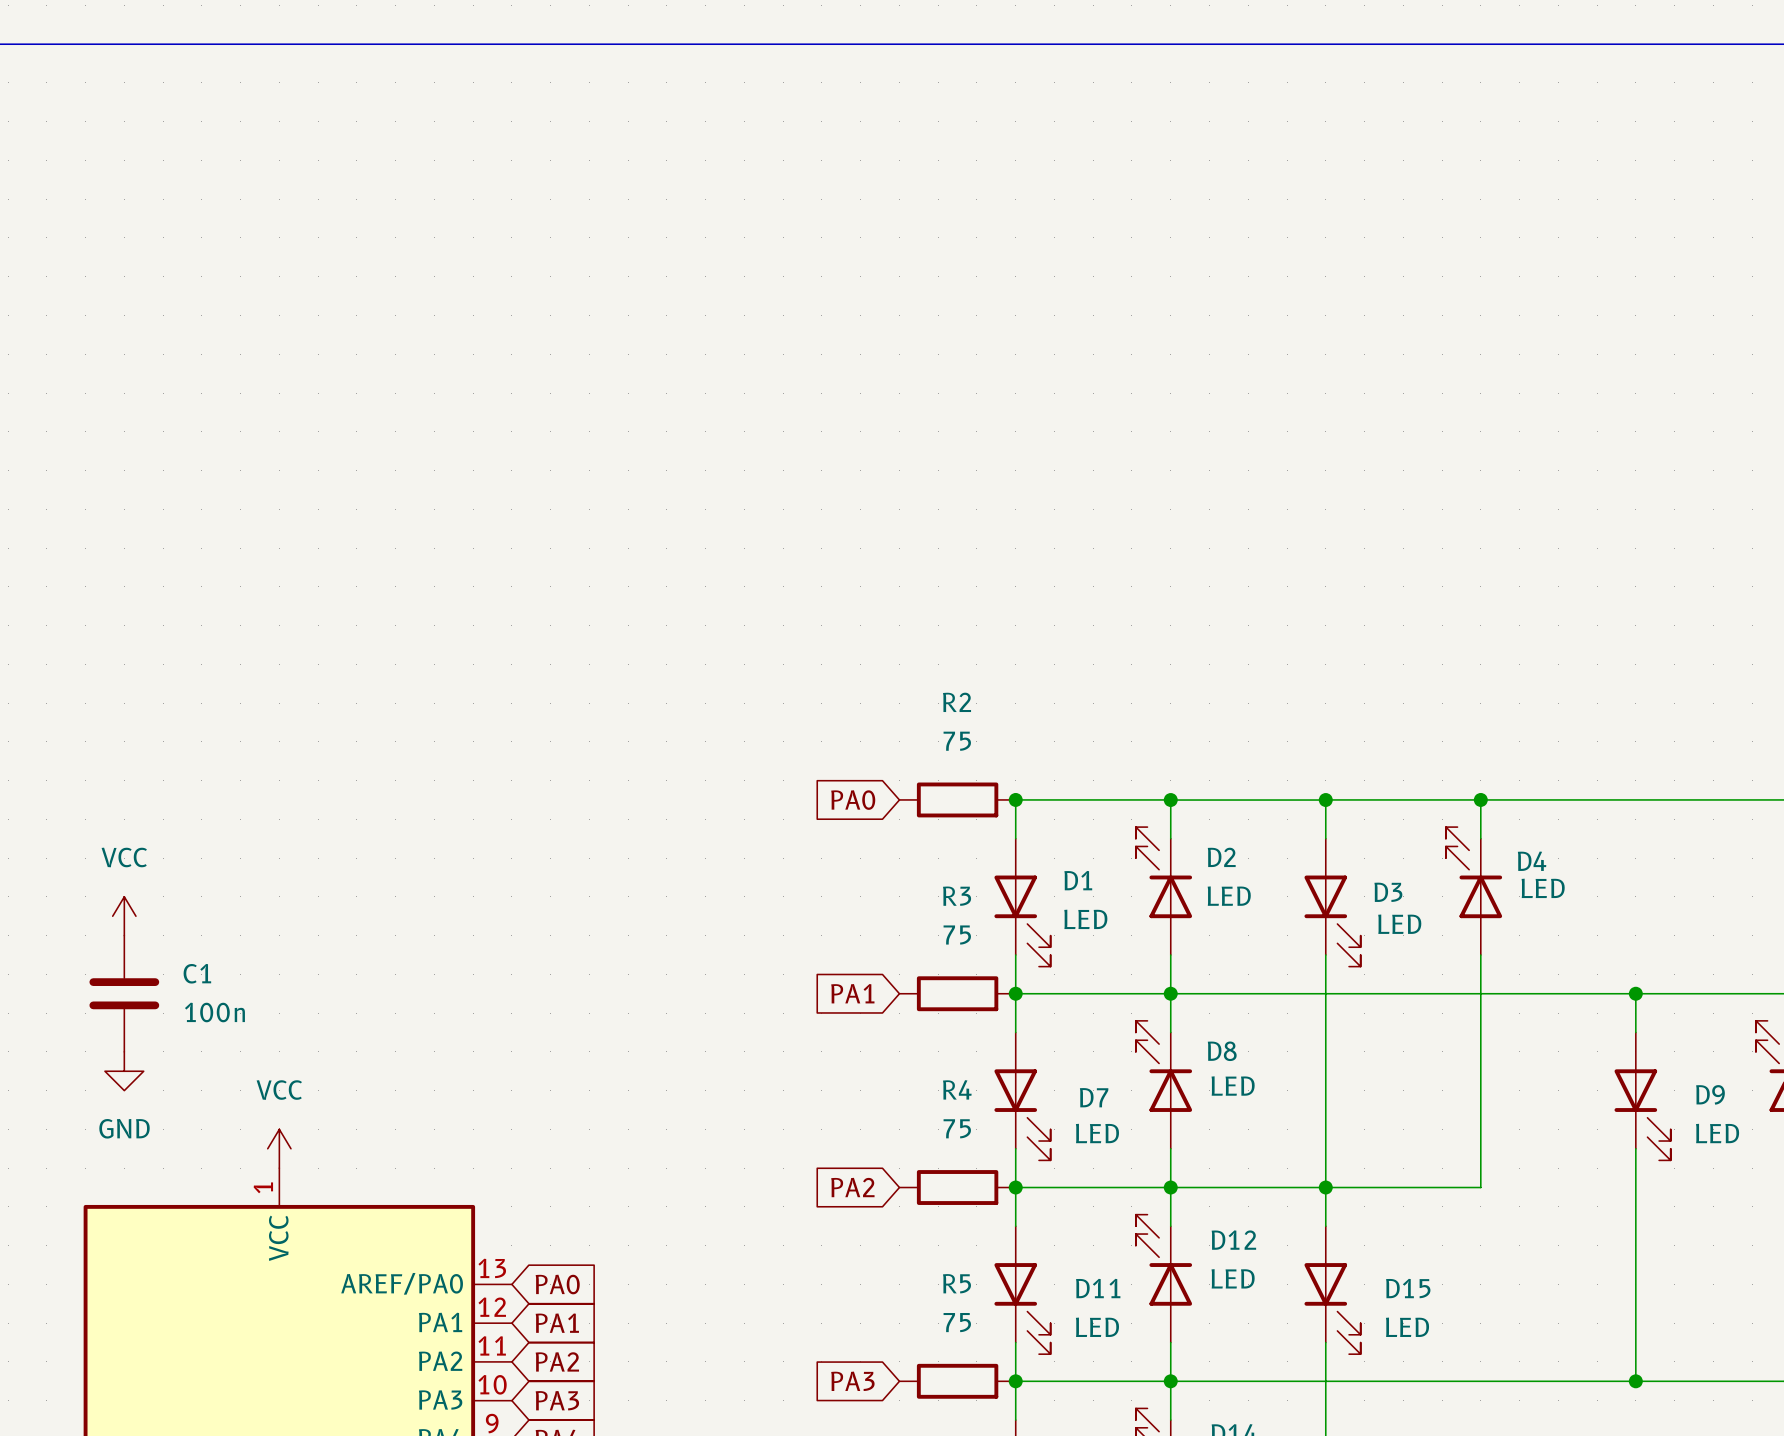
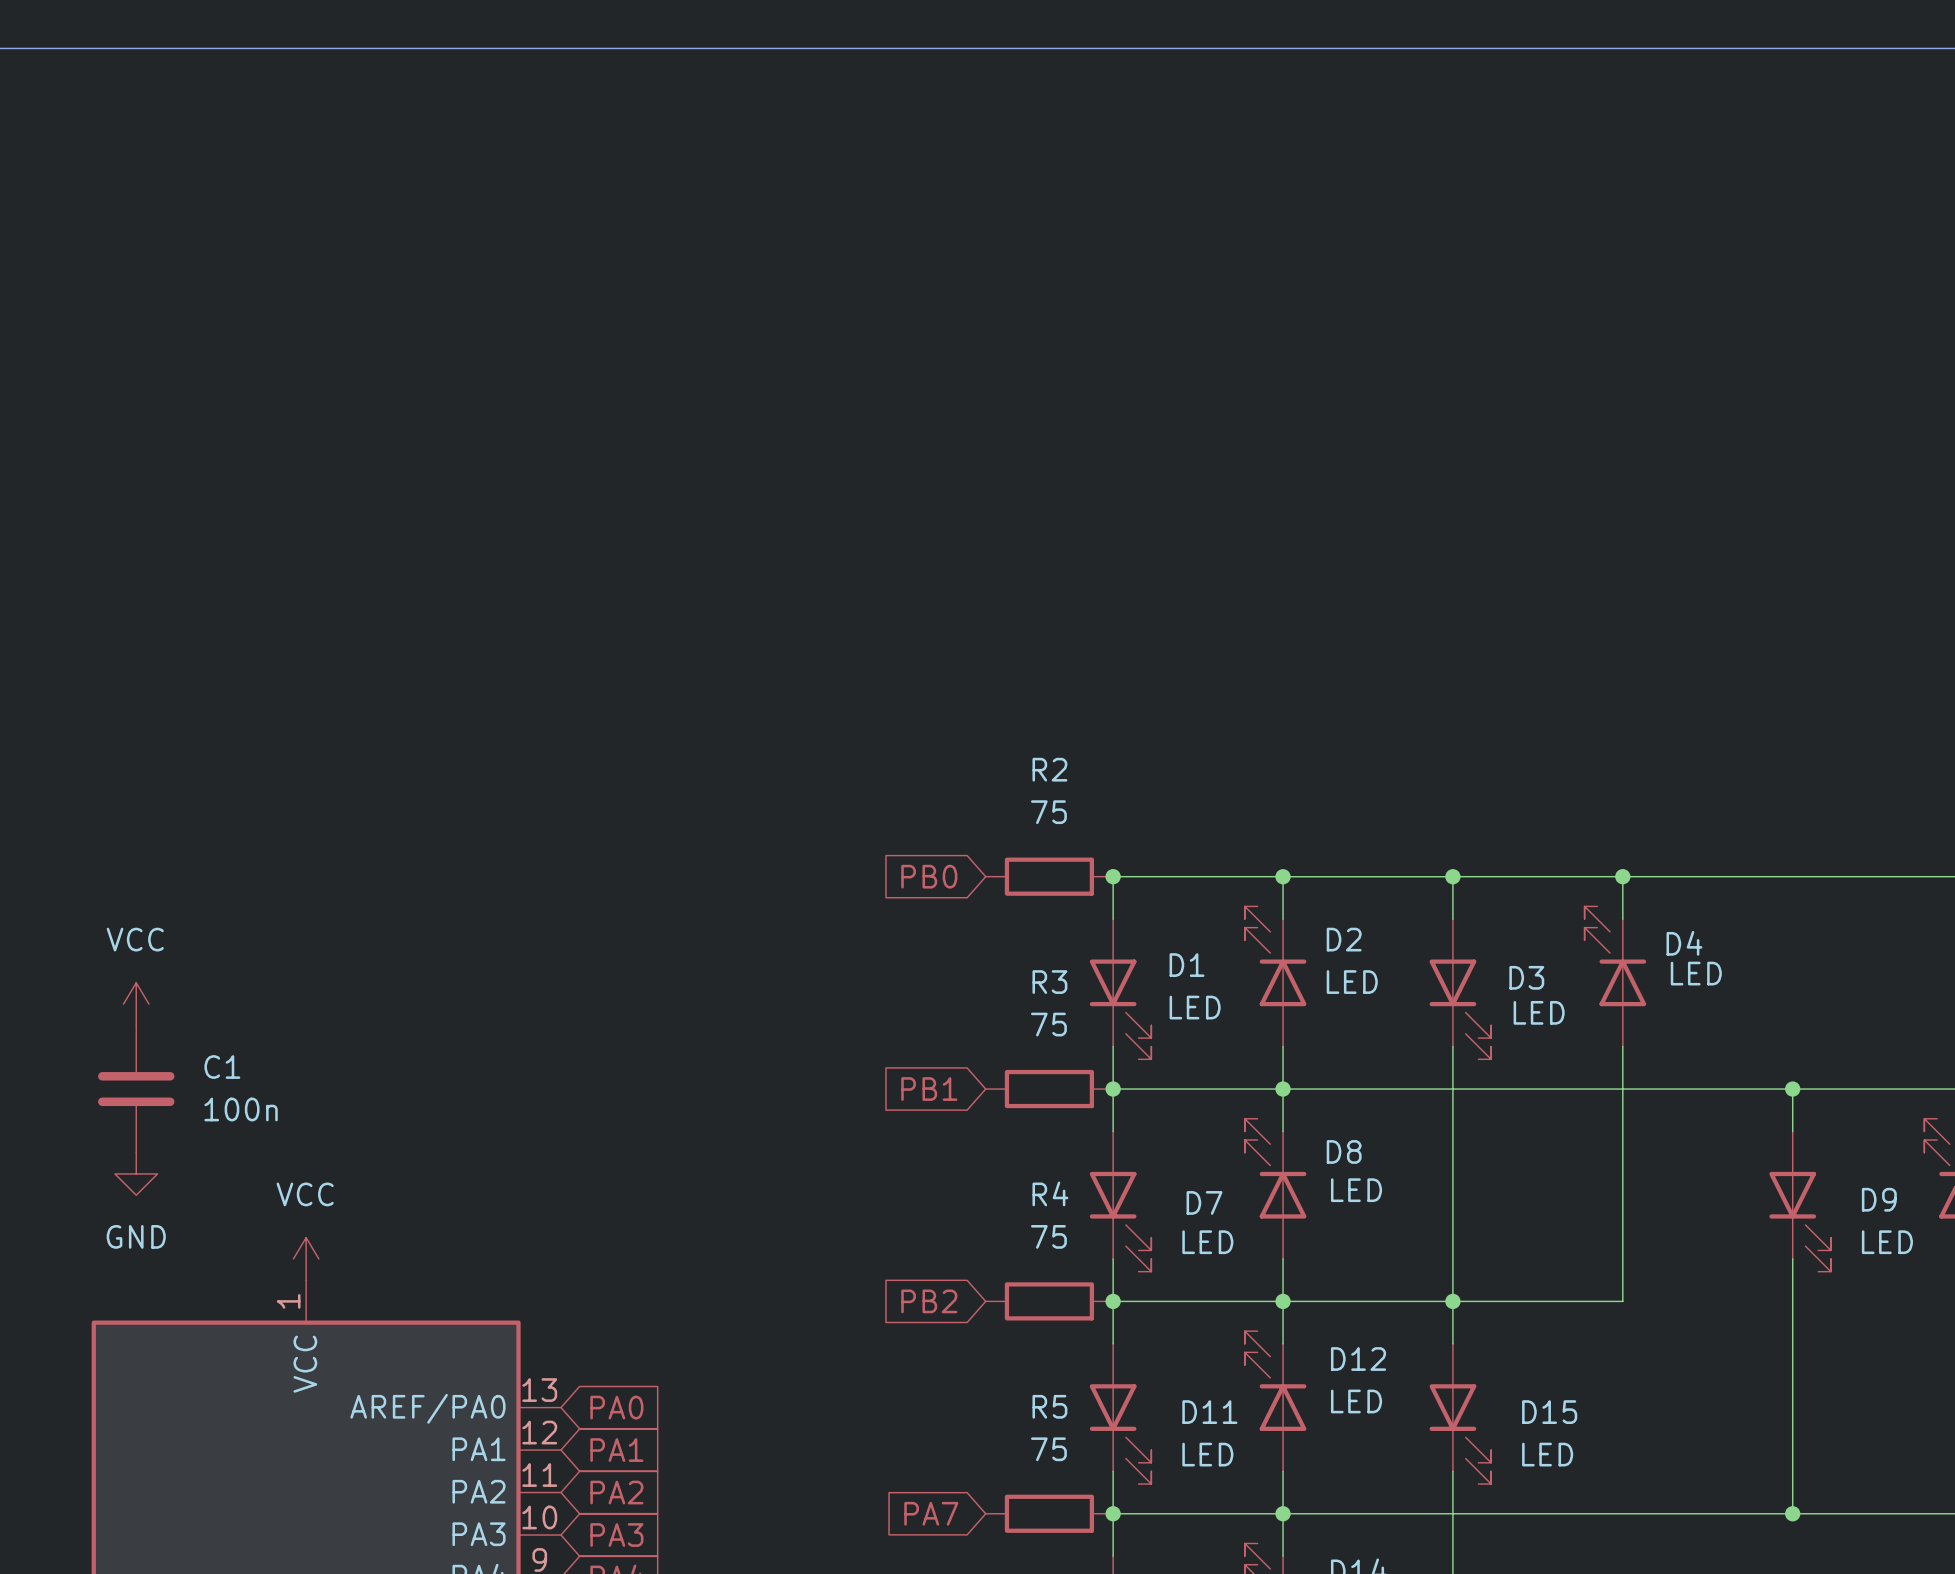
global label: PA0 (853, 800) -> PB0 (929, 876)
global label: PA1 (852, 993) -> PB1 (929, 1089)
global label: PA2 (852, 1187) -> PB2 (929, 1301)
global label: PA3 (852, 1381) -> PA7 (931, 1513)

